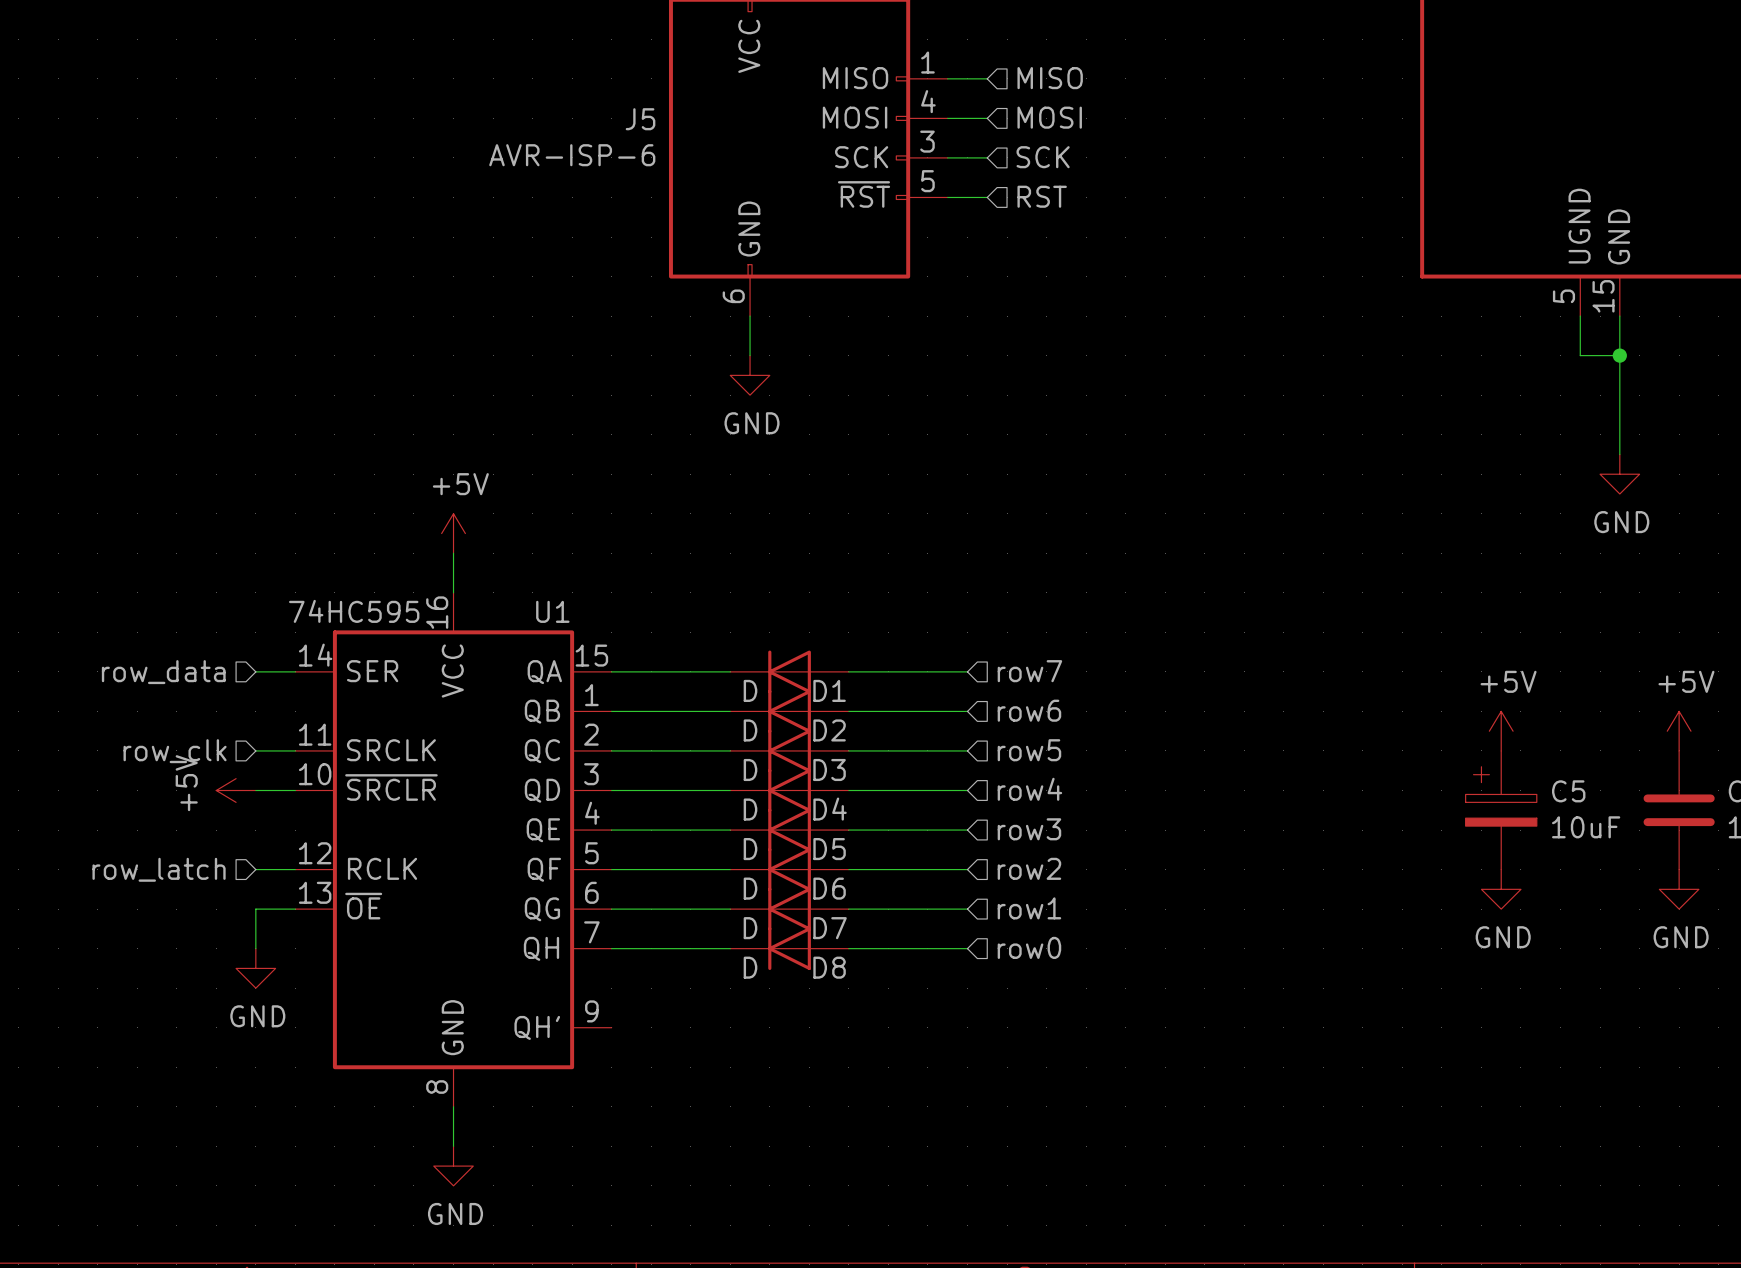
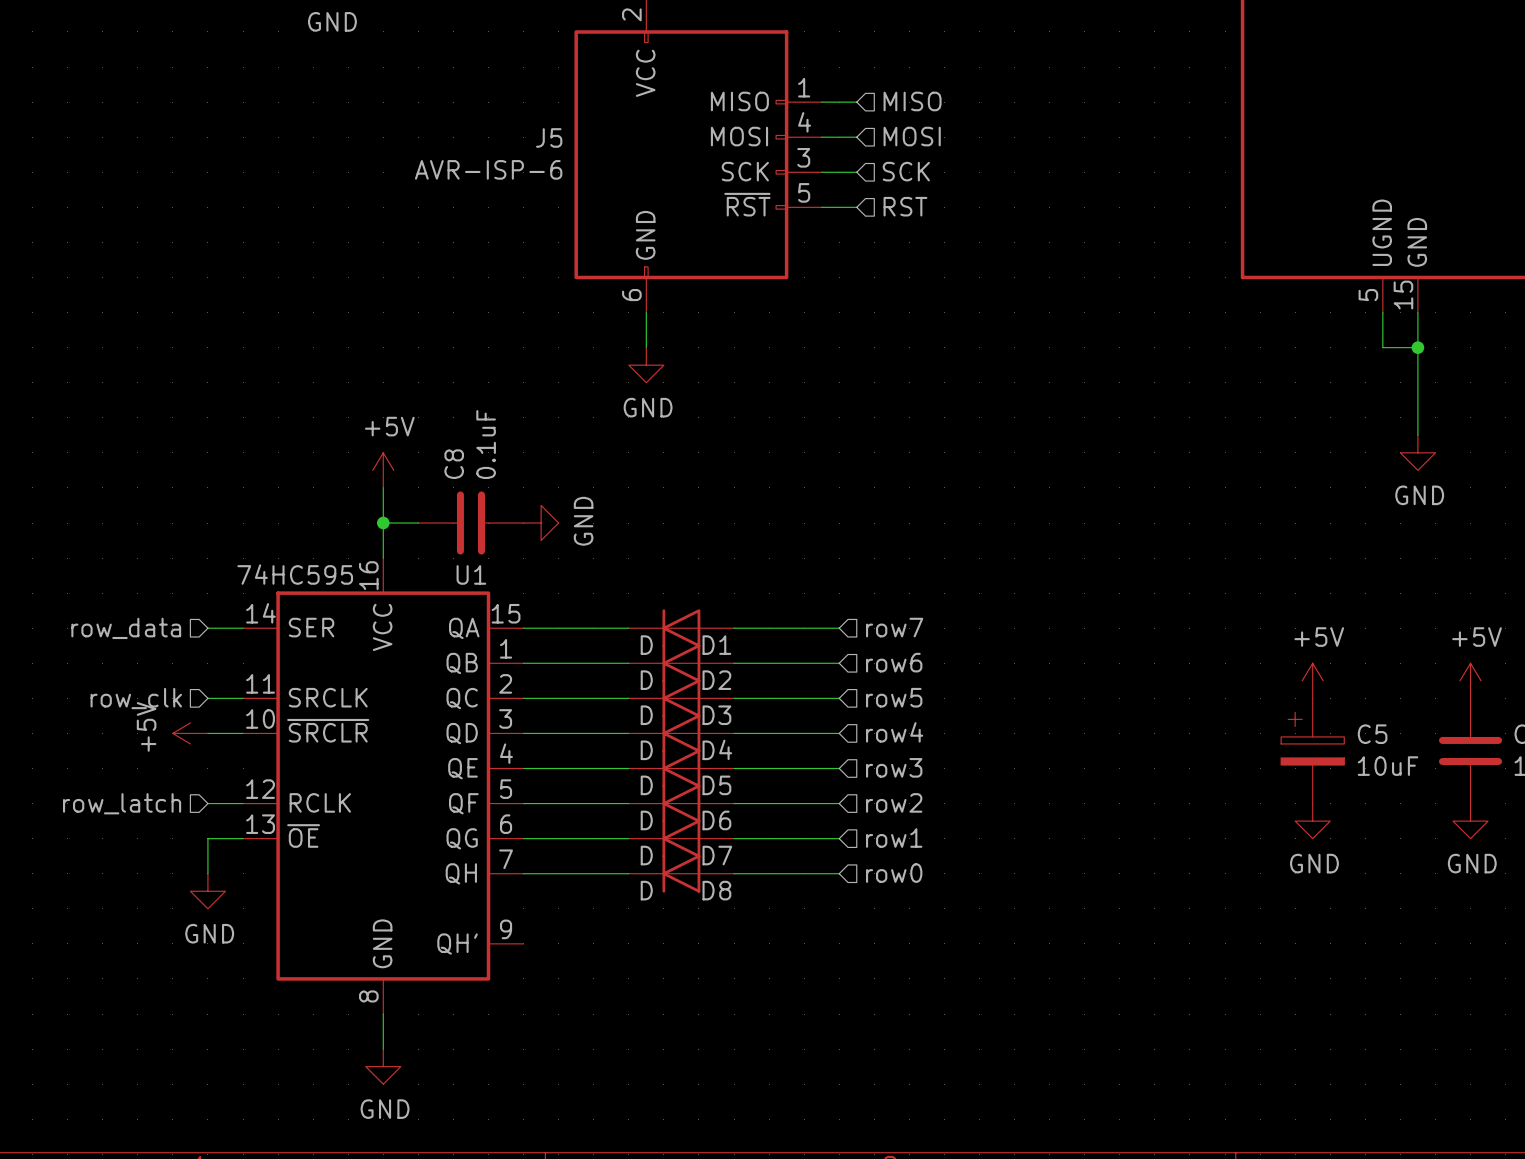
wire: none -> (383, 487) (383, 523) (418, 523)
power symbol position: +5V (453, 533) -> +5V (383, 470)
junction: none -> (383, 523)
C8: none -> 0.1uF (470, 523)
power symbol: none -> GND (541, 523)

